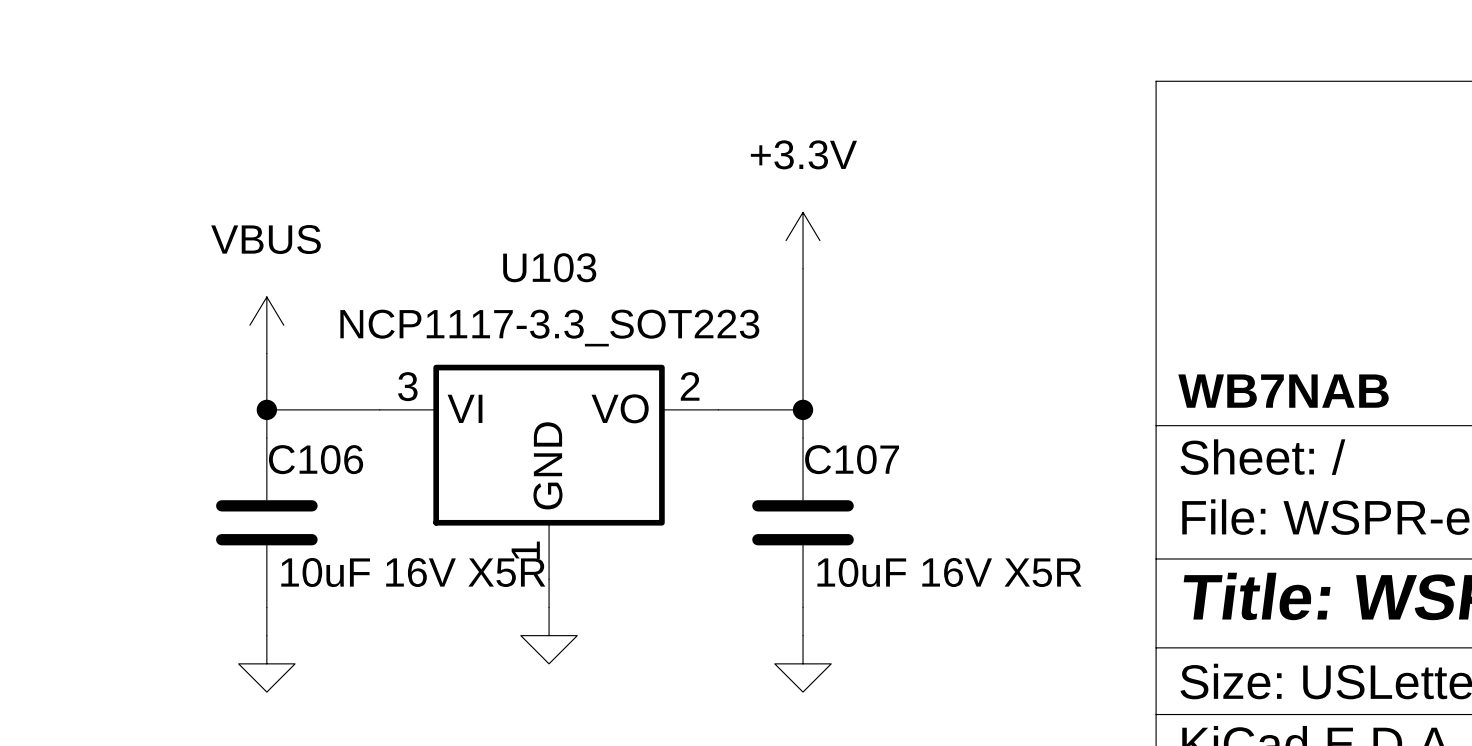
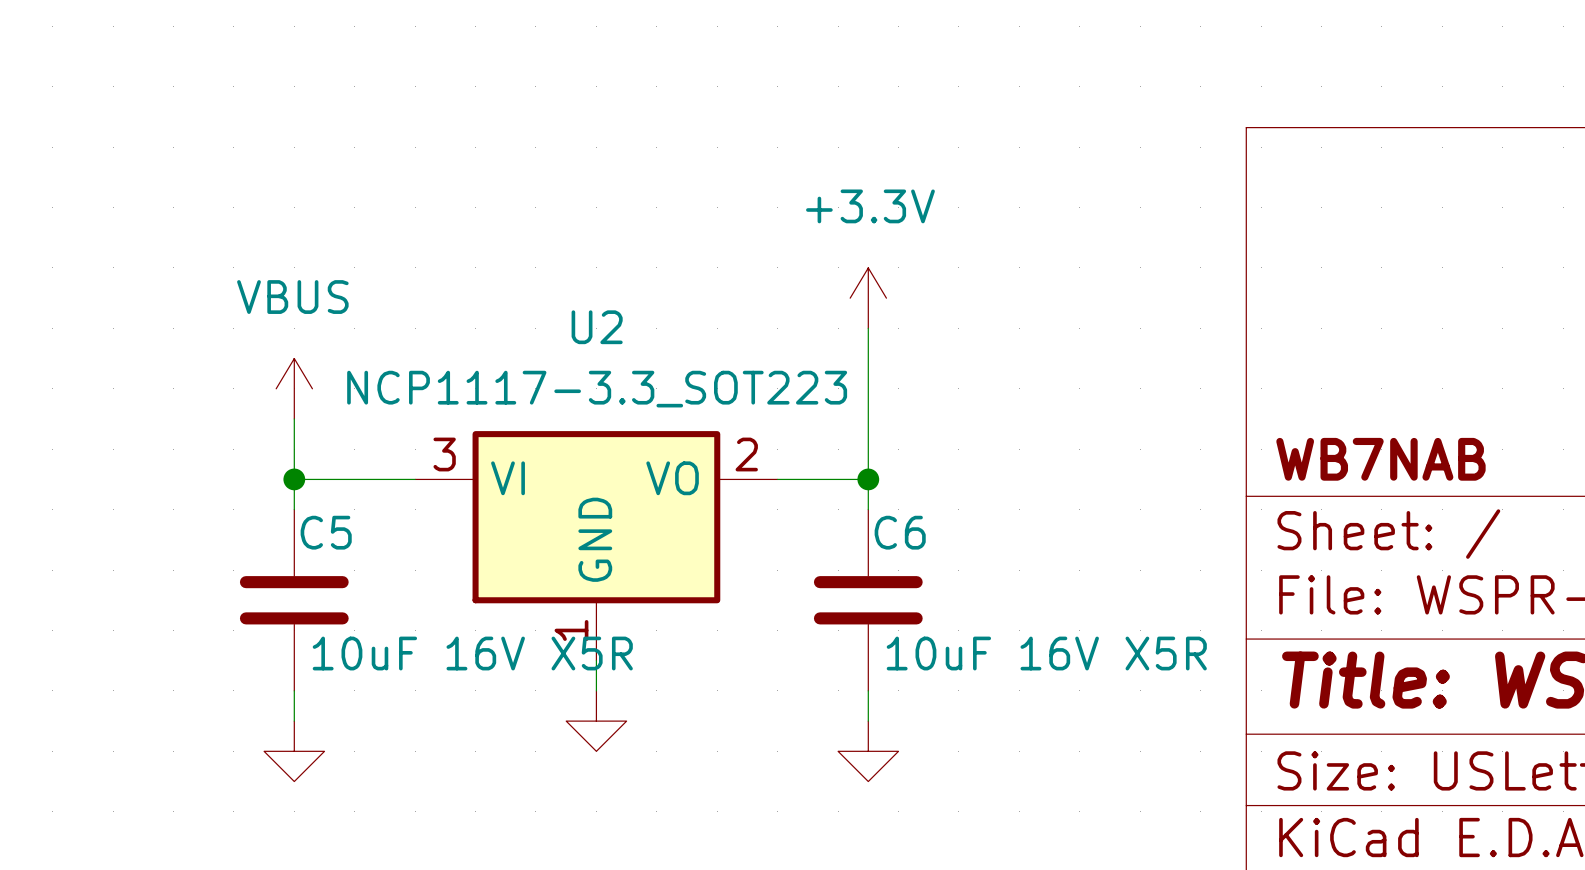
U103 name: U103 (549, 267) -> U2 (597, 327)
C106 name: C106 (316, 459) -> C5 (326, 532)
C107 name: C107 (852, 459) -> C6 (900, 532)

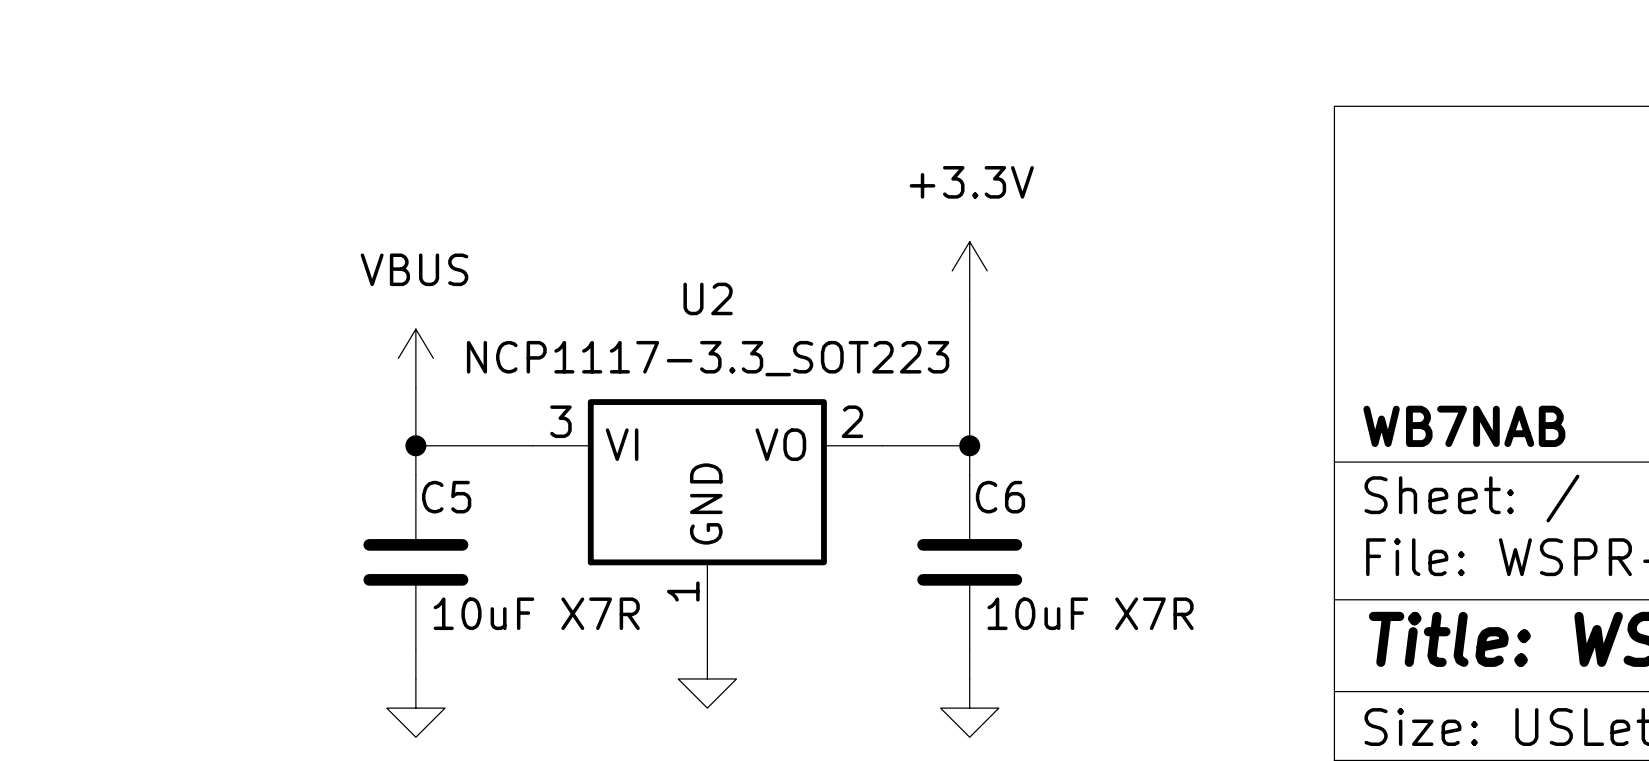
C5 value: 10uF 16V X5R (472, 653) -> 10uF X7R (536, 613)
C6 value: 10uF 16V X5R (1046, 653) -> 10uF X7R (1090, 613)

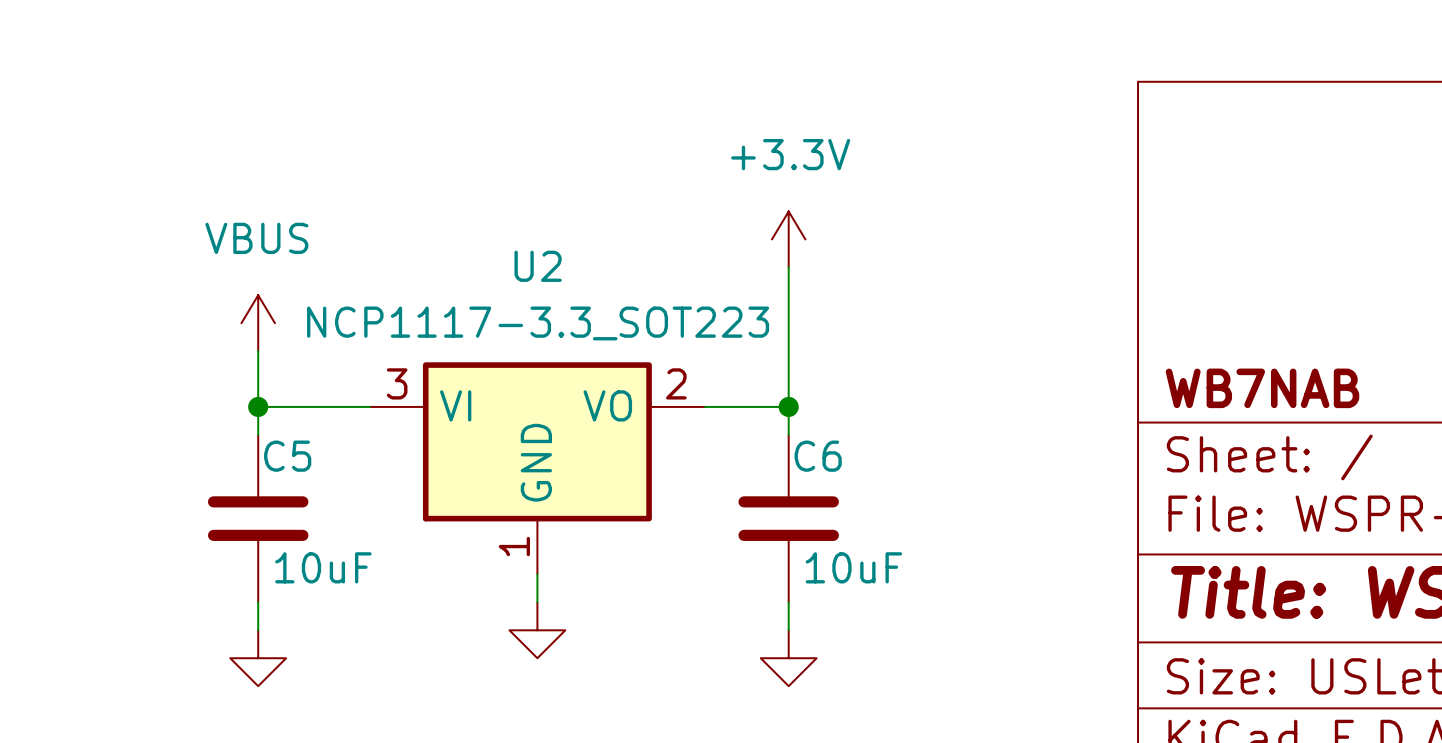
C5 value: 10uF X7R (536, 613) -> 10uF (323, 567)
C6 value: 10uF X7R (1090, 613) -> 10uF (853, 567)

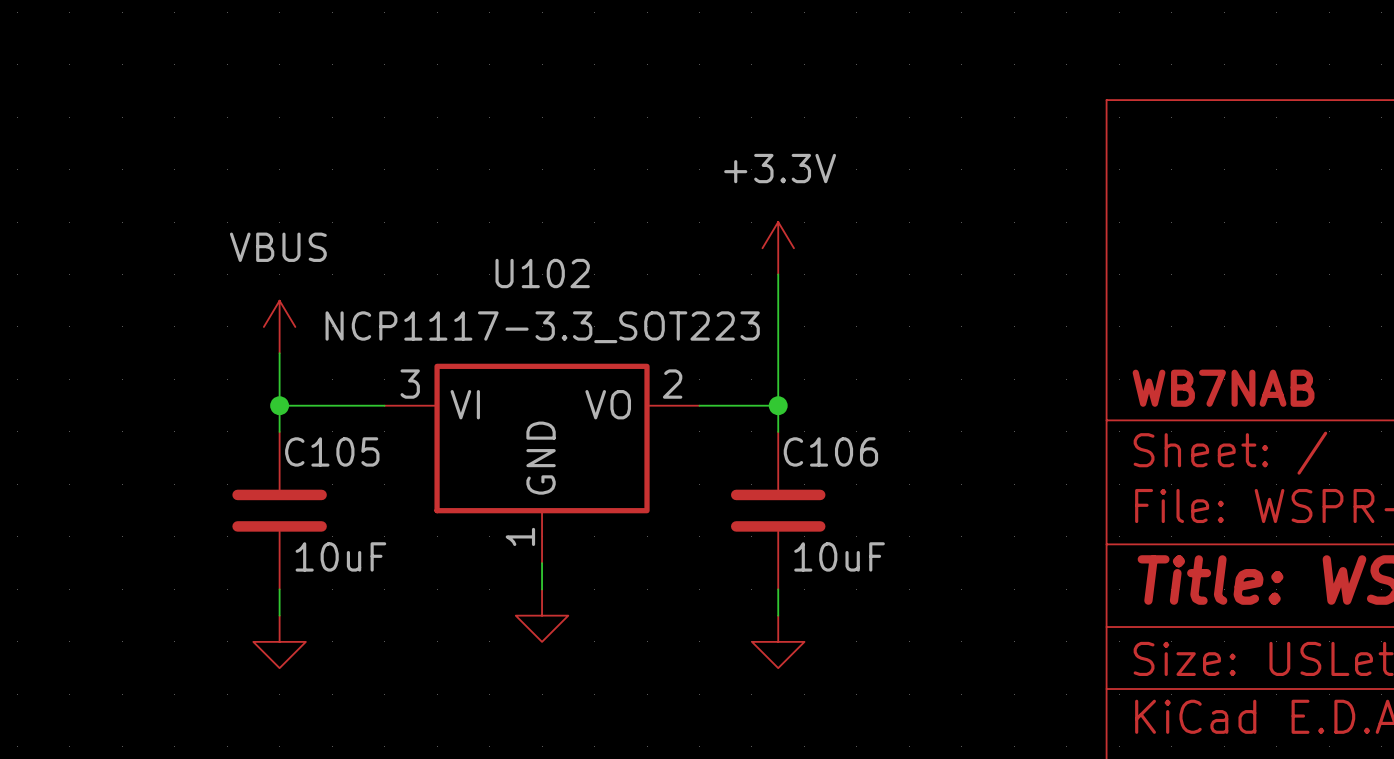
U2 name: U2 (538, 266) -> U102 (542, 273)
C5 name: C5 (287, 456) -> C105 (332, 451)
C6 name: C6 (818, 456) -> C106 (830, 451)

